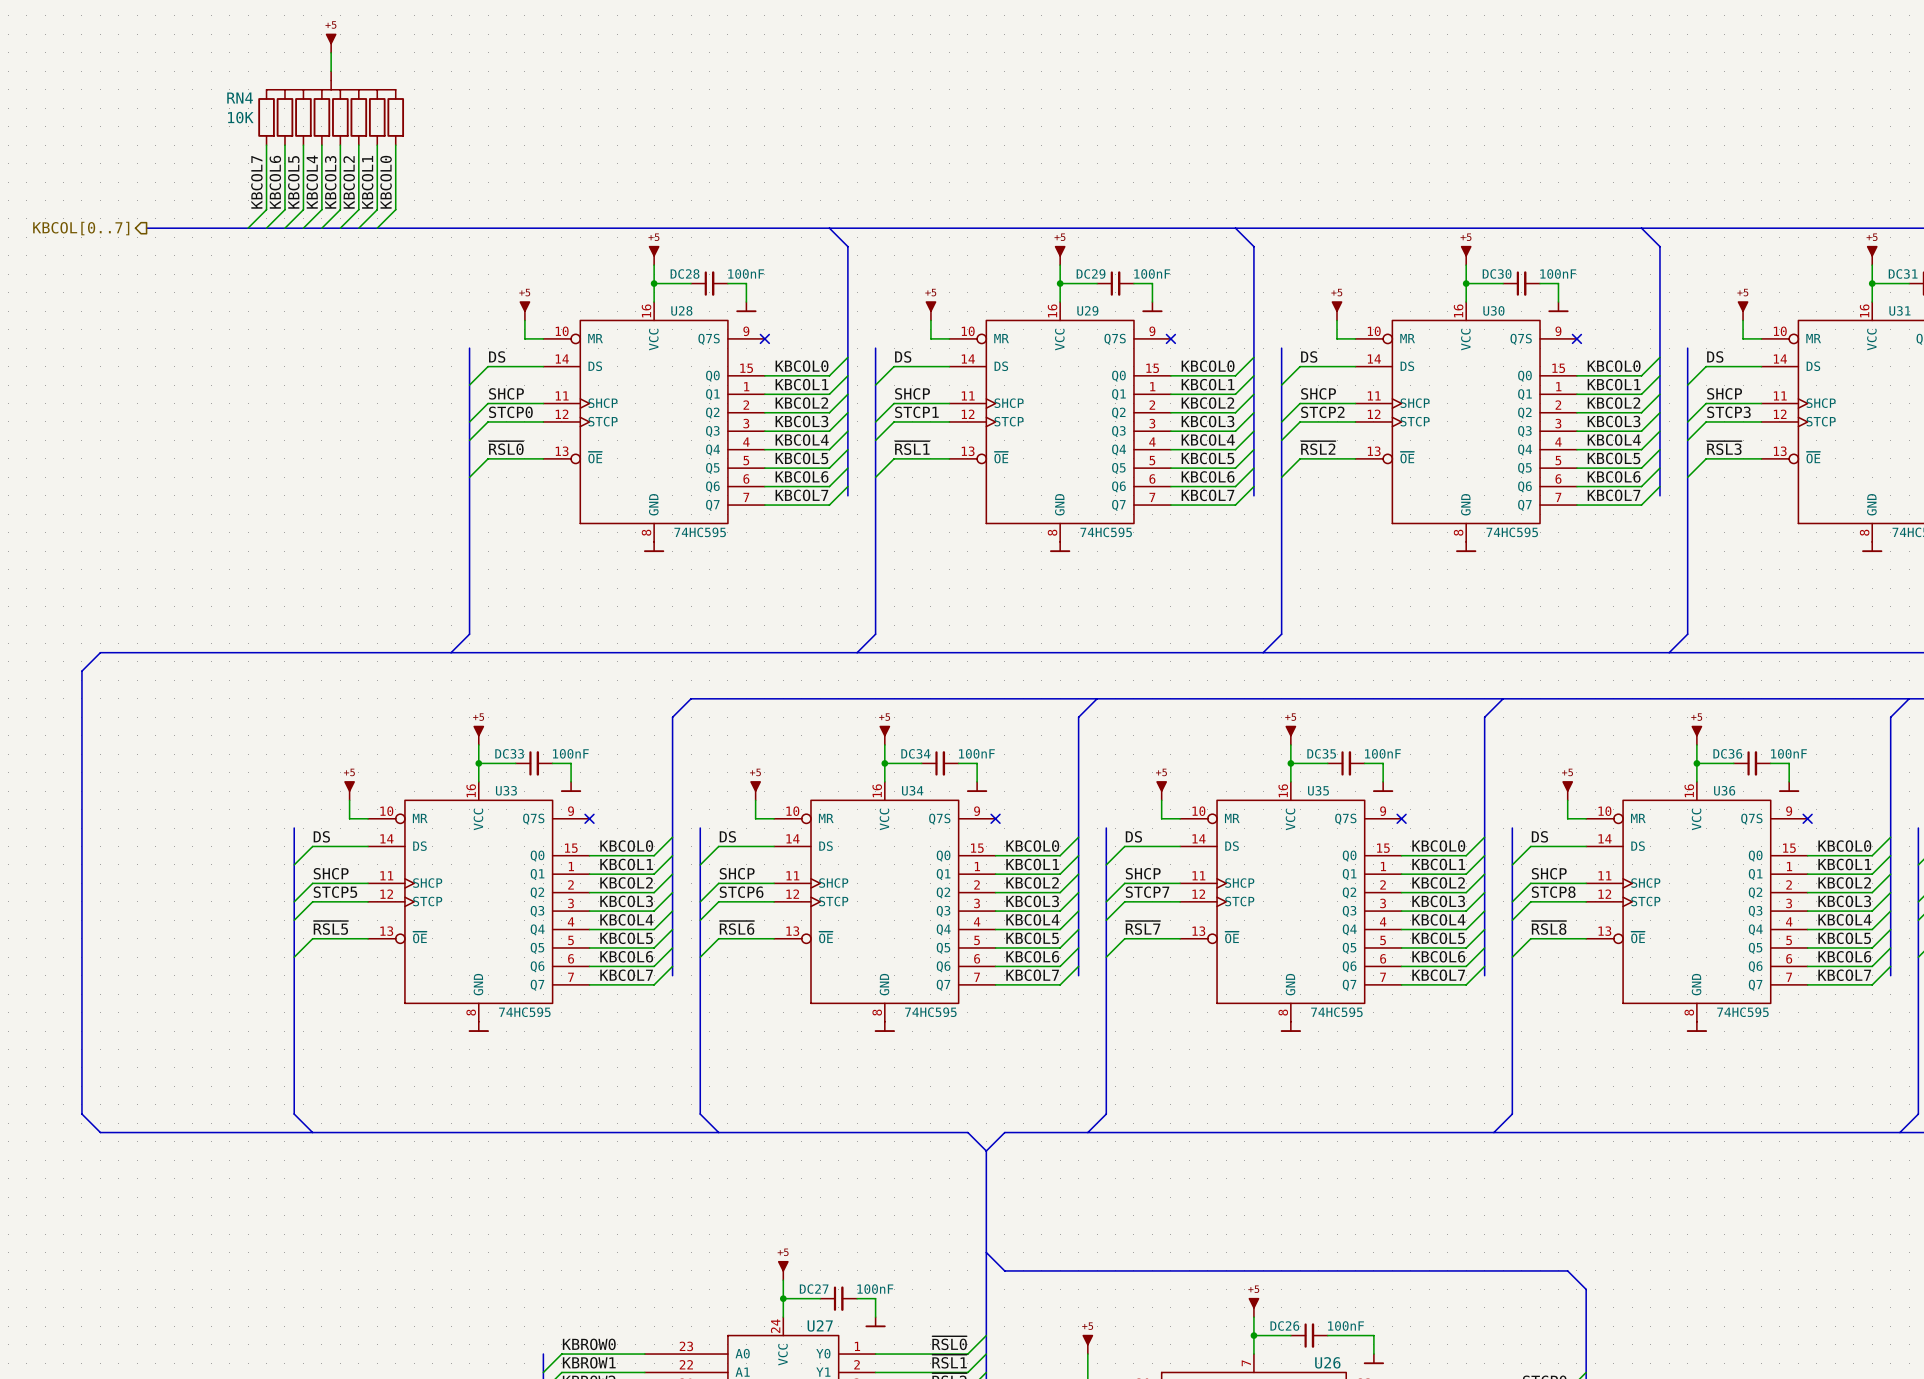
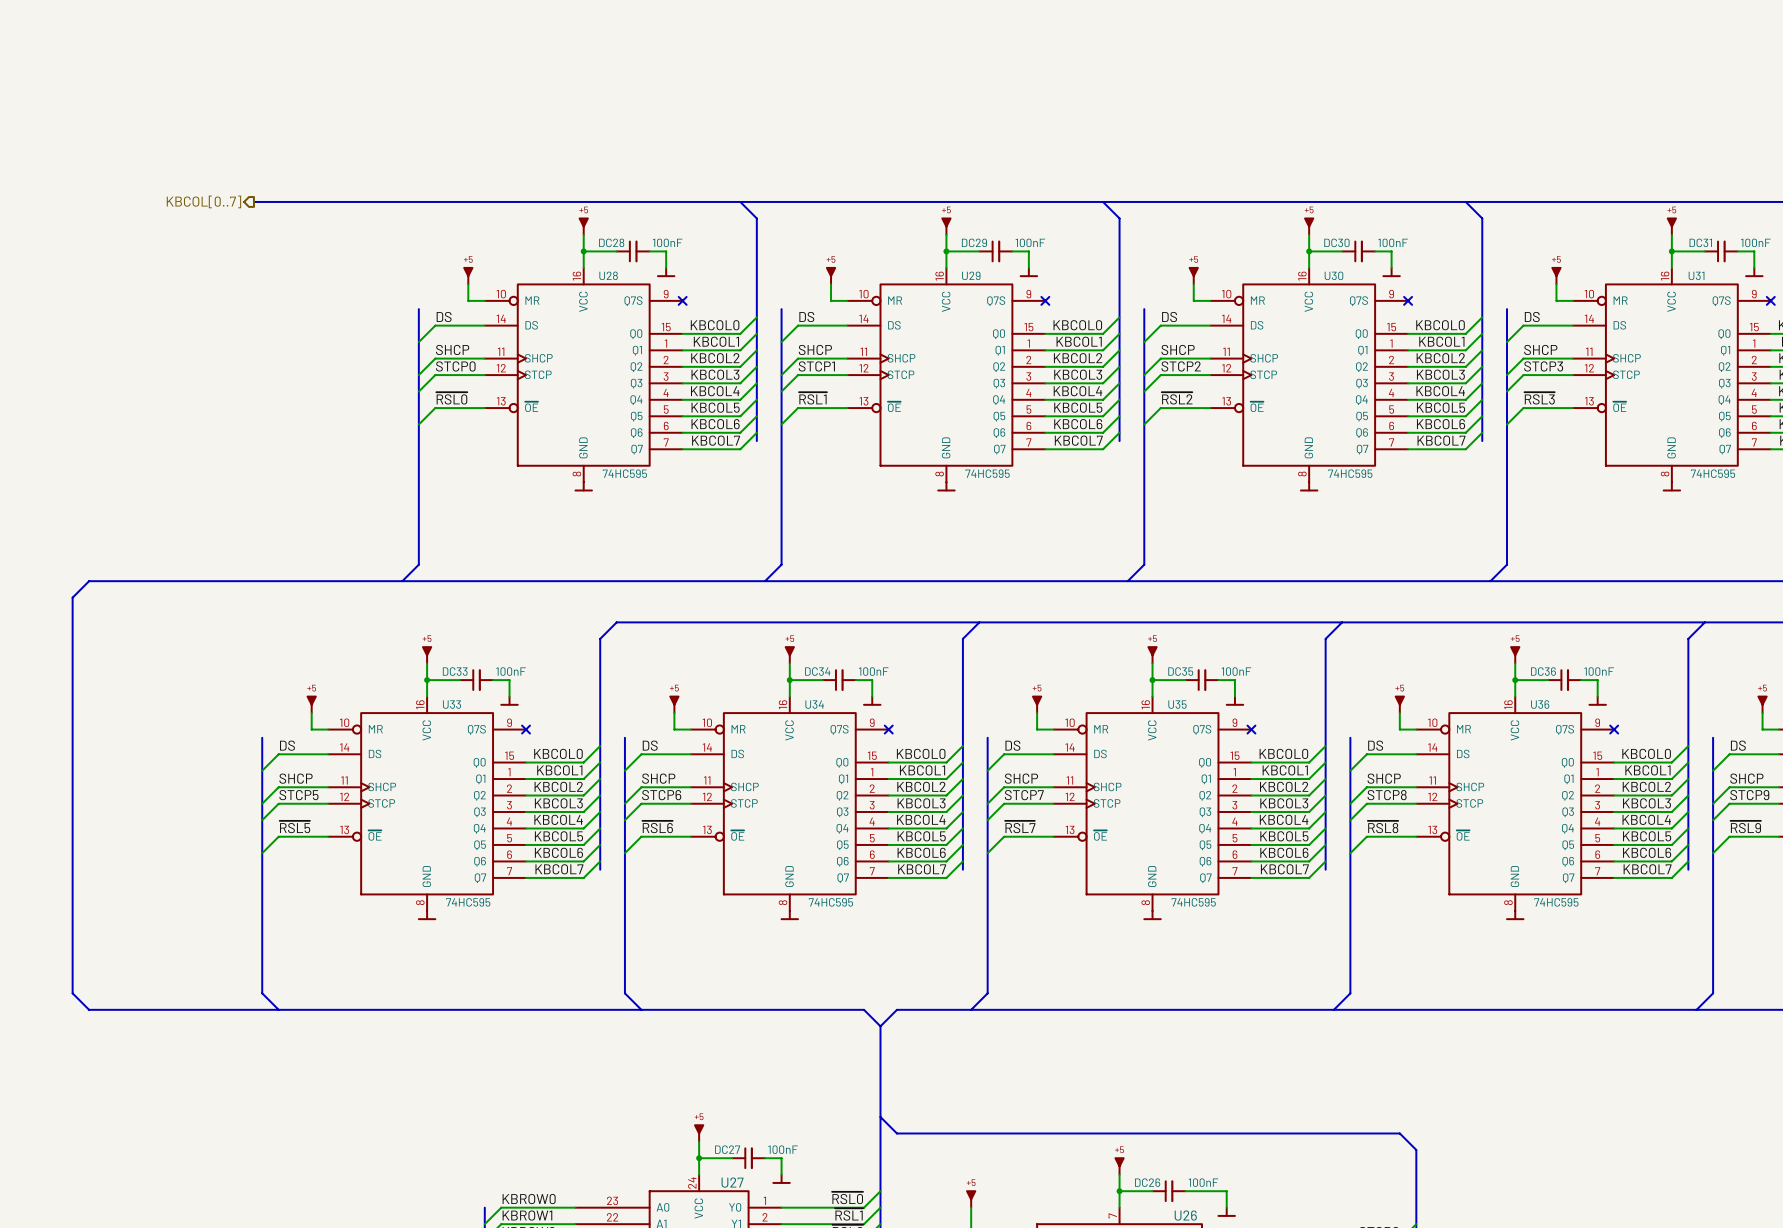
power symbol: (331, 43) -> none
wire: (331, 52) (331, 71) -> none
RN4: 10K (331, 108) -> none
wire: (266, 145) (266, 209) (248, 228) -> none
wire: (284, 145) (284, 209) (266, 228) -> none
wire: (303, 145) (303, 209) (284, 228) -> none
wire: (321, 145) (321, 209) (303, 228) -> none
wire: (340, 145) (340, 209) (321, 228) -> none
wire: (358, 145) (358, 209) (340, 228) -> none
wire: (377, 145) (377, 209) (358, 228) -> none
wire: (395, 145) (395, 209) (377, 228) -> none
label: KBCOL7 (256, 182) -> none
label: KBCOL6 (275, 182) -> none
label: KBCOL5 (293, 182) -> none
label: KBCOL4 (312, 182) -> none
label: KBCOL3 (330, 182) -> none
label: KBCOL2 (349, 182) -> none
label: KBCOL1 (367, 182) -> none
label: KBCOL0 (386, 182) -> none
hierarchical label position: KBCOL[0..7] (81, 228) -> KBCOL[0..7] (203, 201)
bus: (146, 228) (284, 228) -> none

